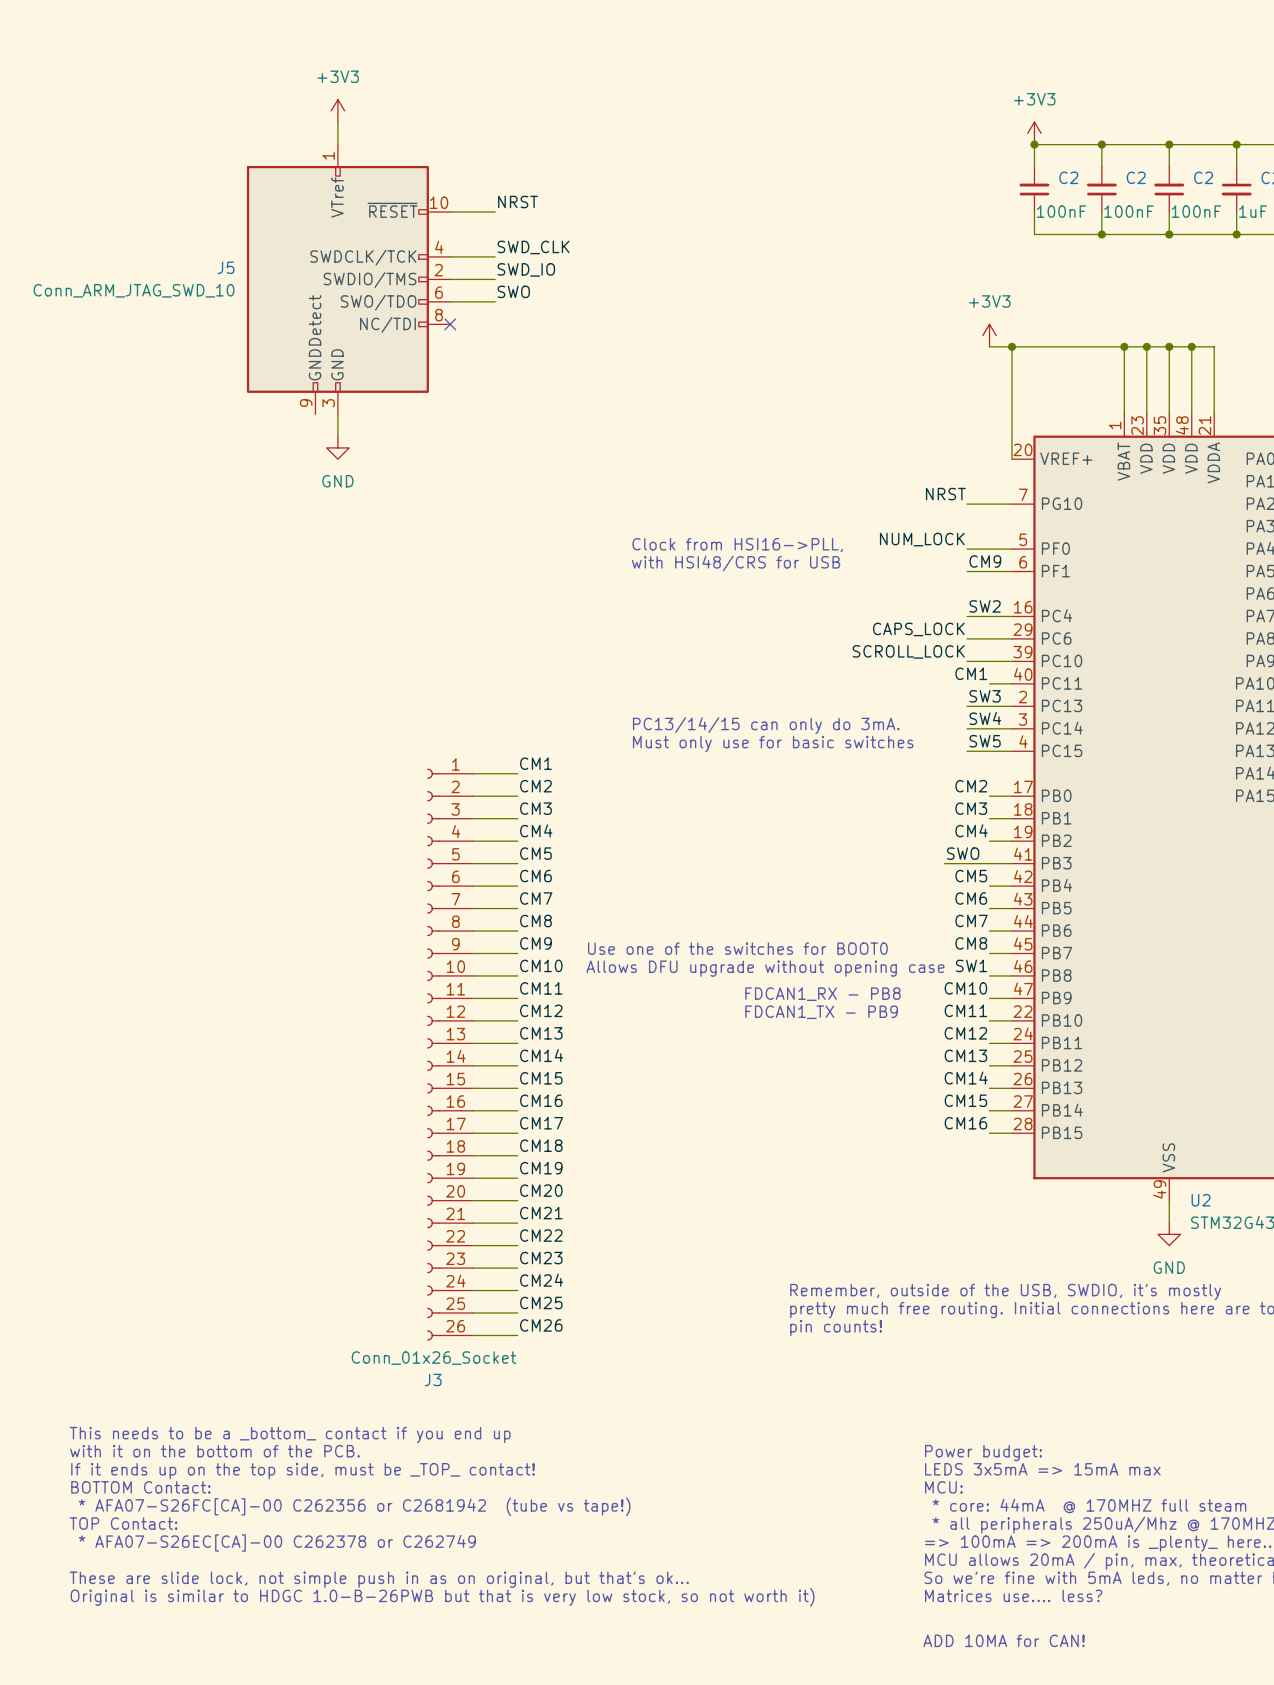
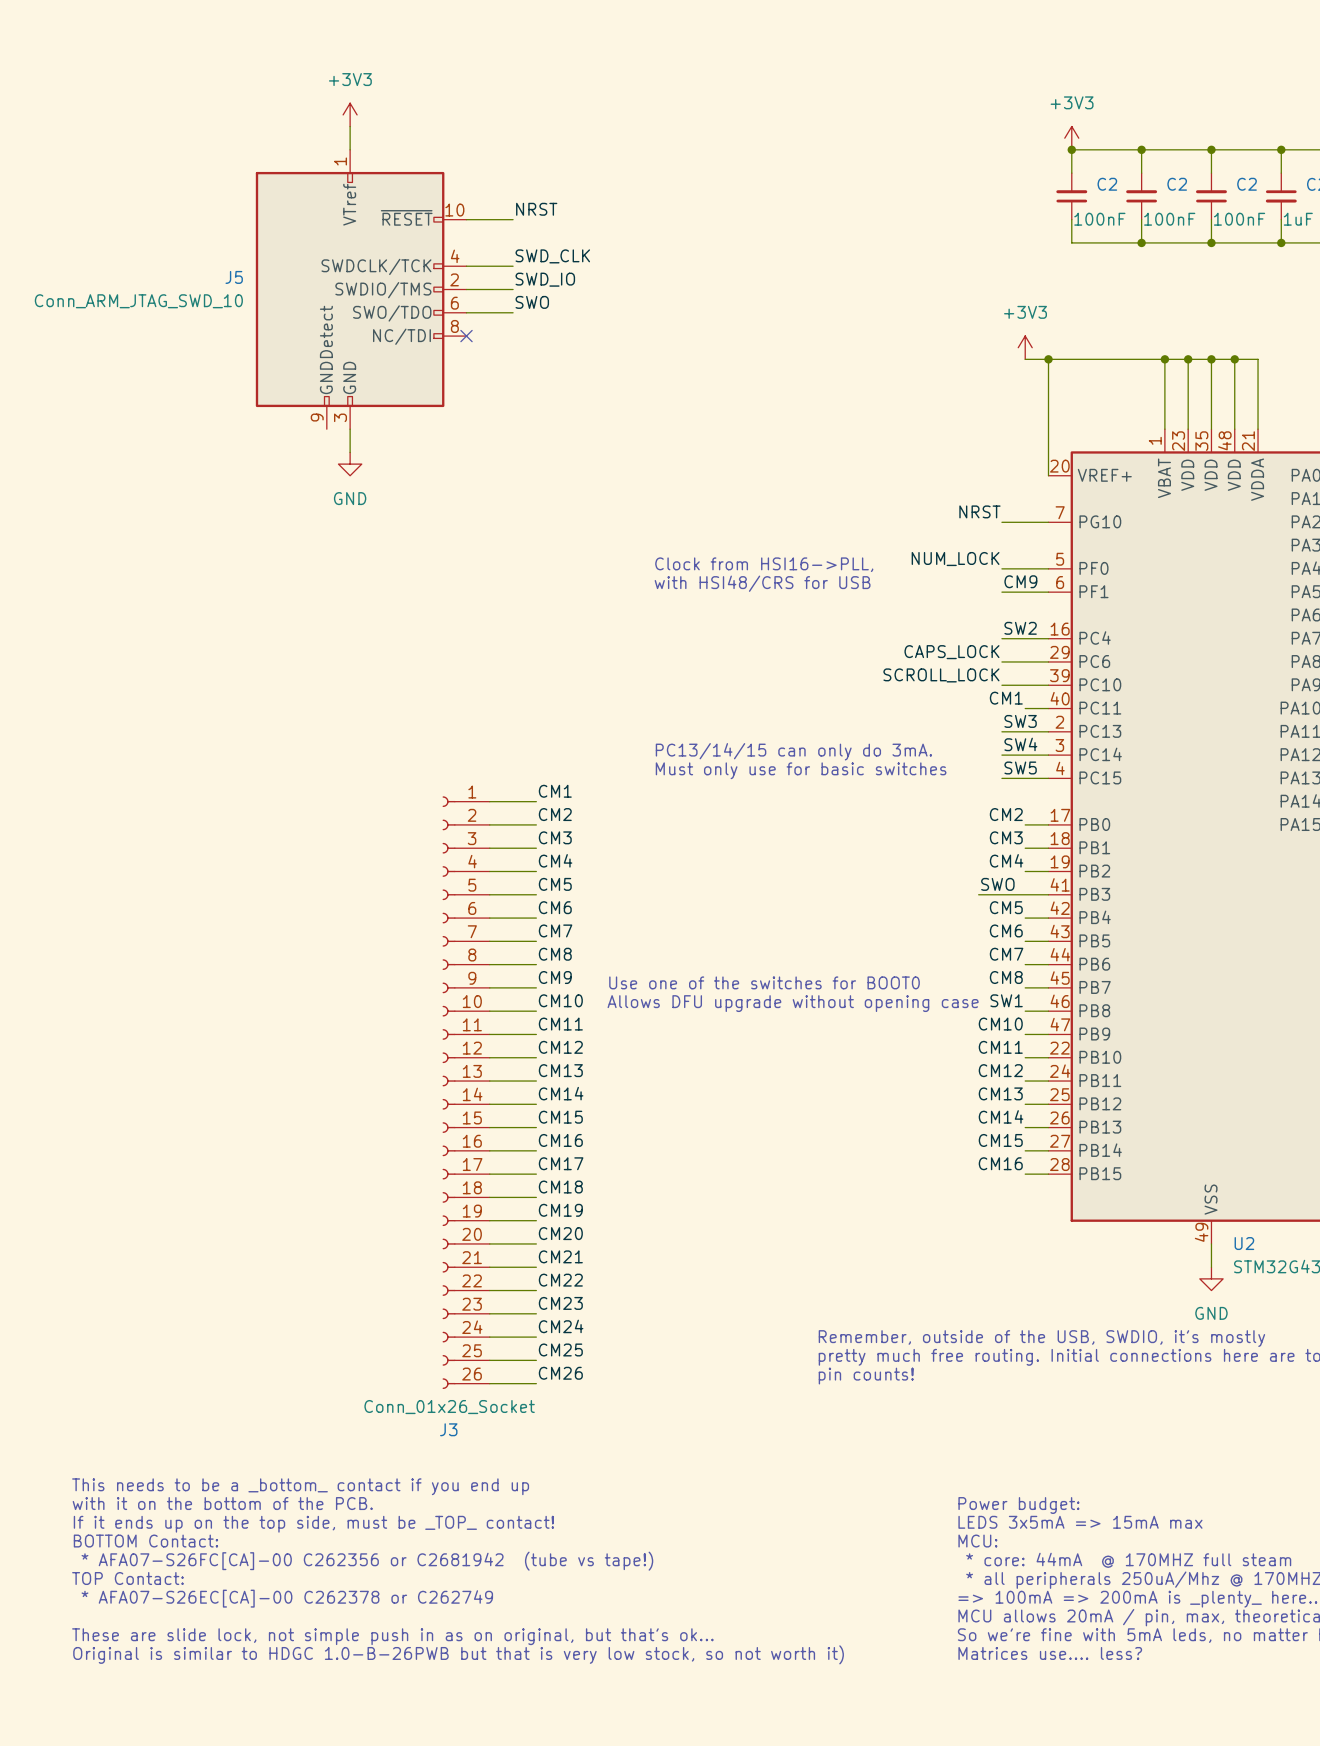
text: FDCAN1_RX - PB8 (822, 994) -> none
text: FDCAN1_TX - PB9 (821, 1012) -> none
text: ADD 10MA for CAN! (1004, 1640) -> none

